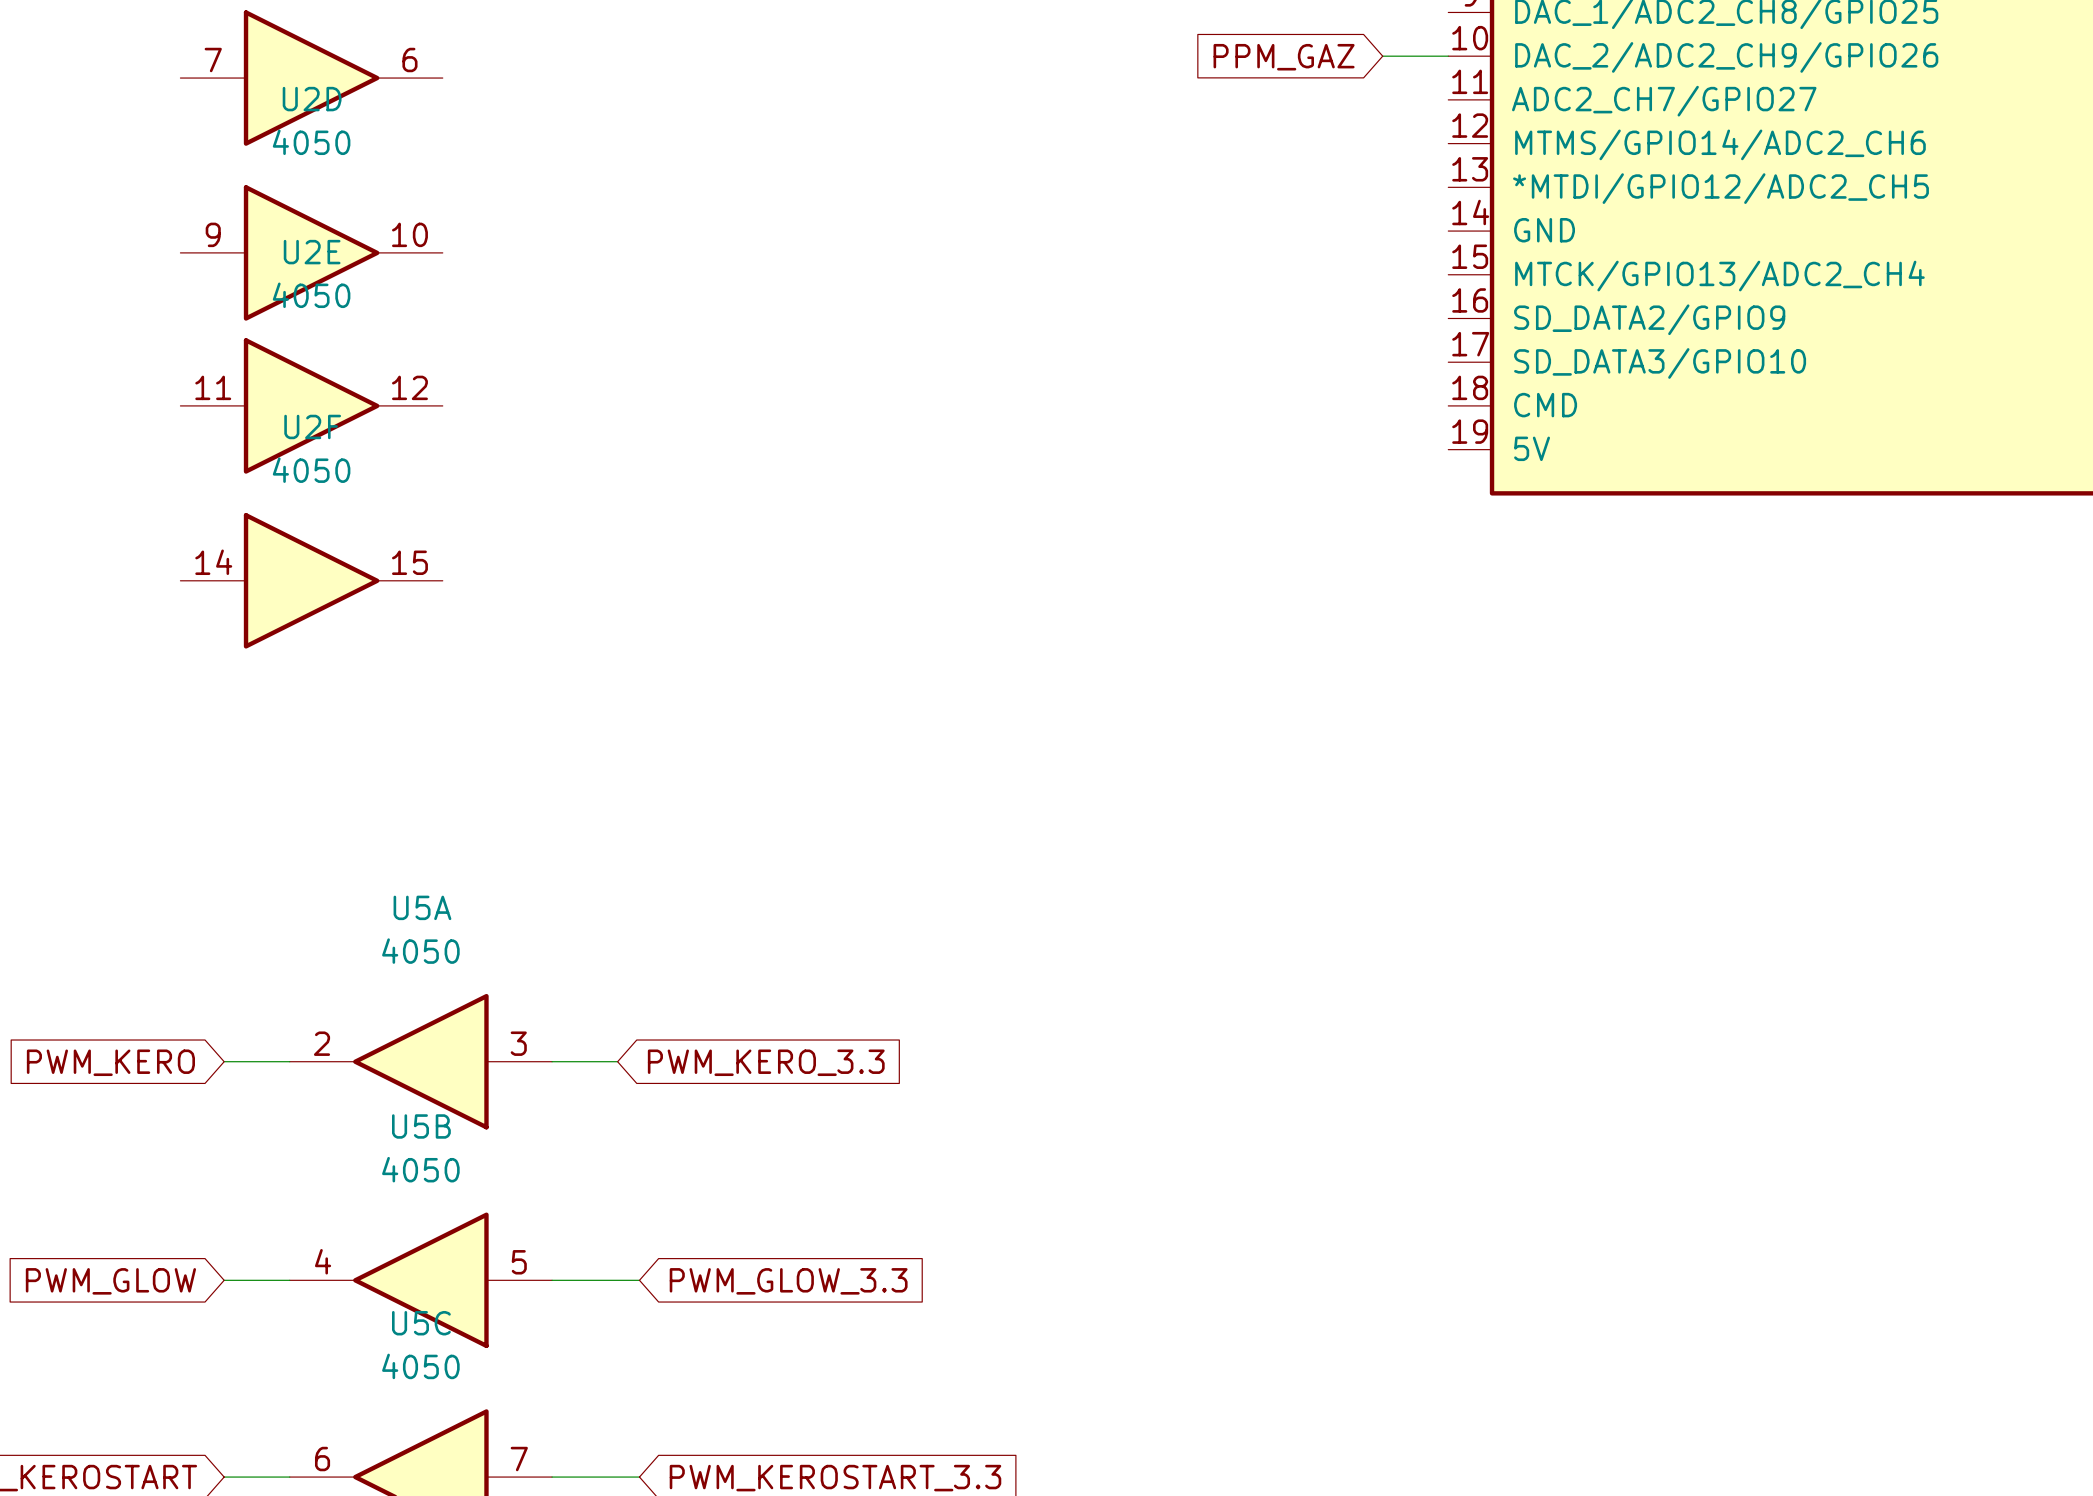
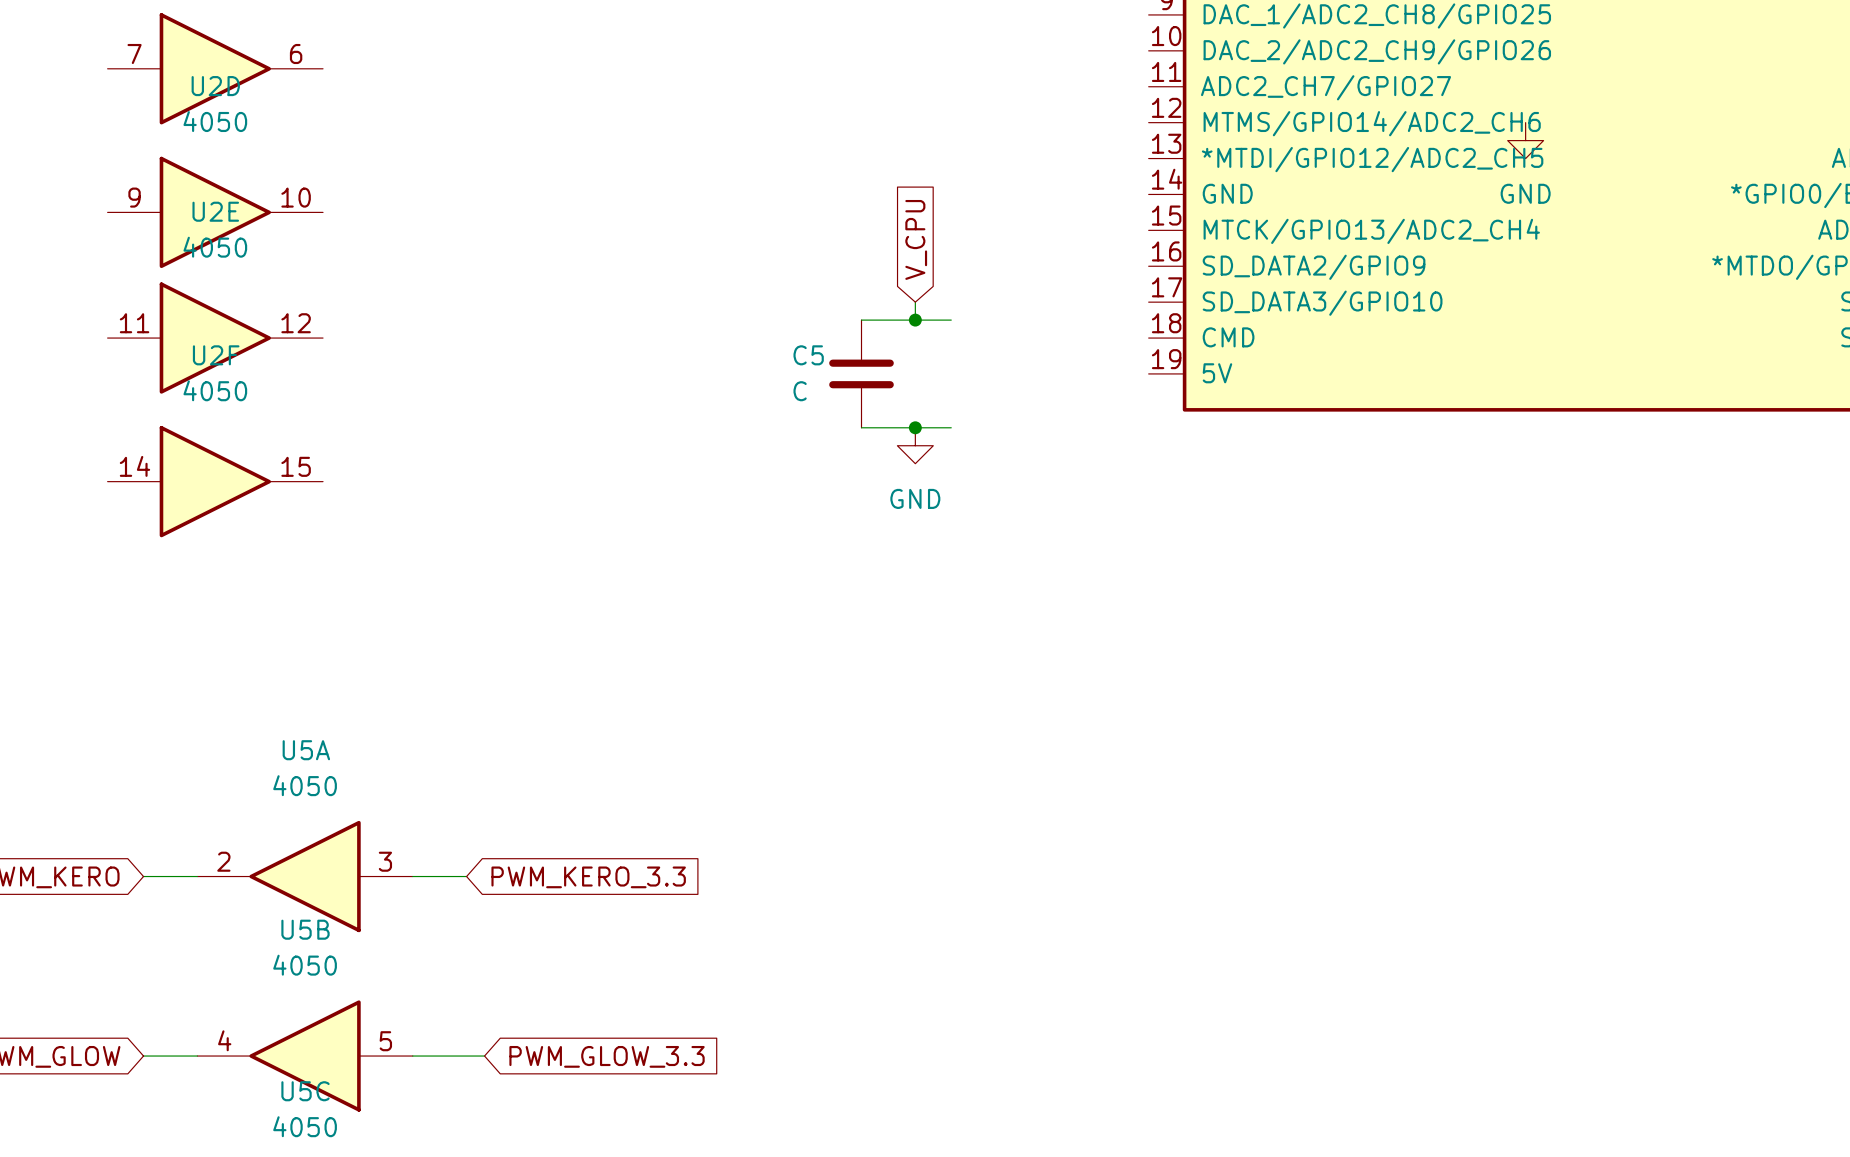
wire: (1382, 56) (1448, 56) -> none
global label: PPM_GAZ (1284, 57) -> none
power symbol: none -> GND (1525, 140)
global label: none -> V_CPU (916, 239)
wire: none -> (915, 302) (915, 320)
wire: none -> (861, 320) (951, 320)
junction: none -> (915, 320)
C5: none -> C (861, 373)
wire: none -> (861, 427) (951, 427)
junction: none -> (915, 427)
power symbol: none -> GND (915, 445)

